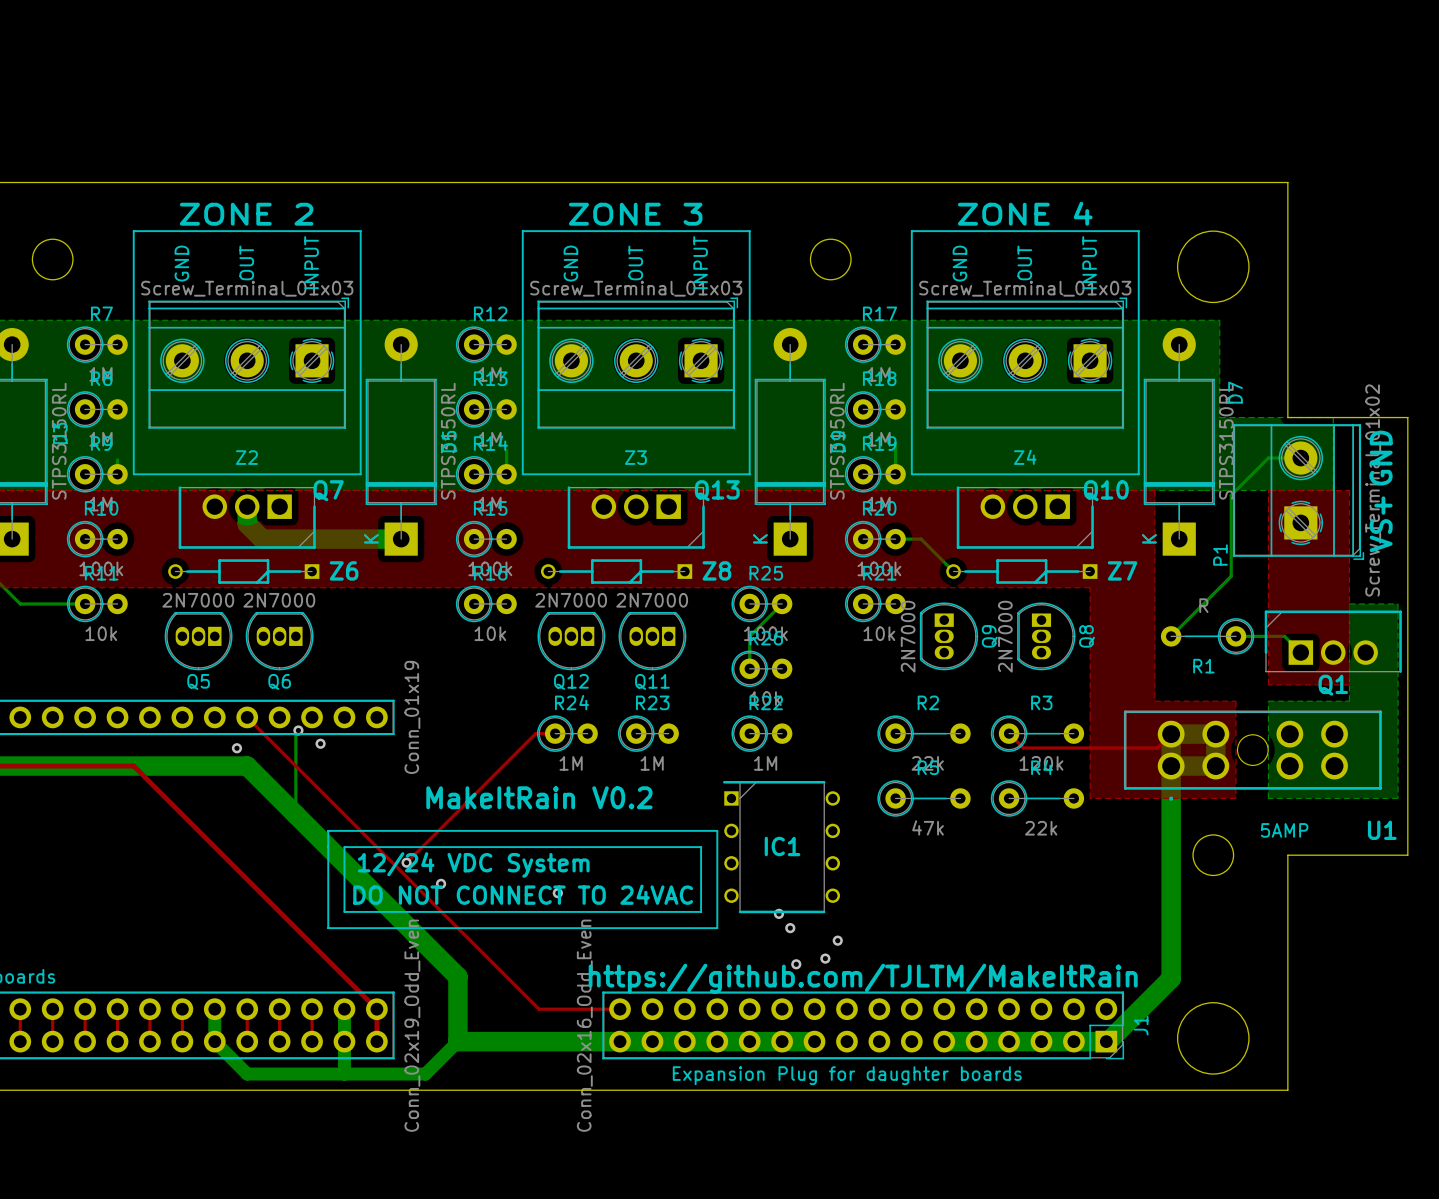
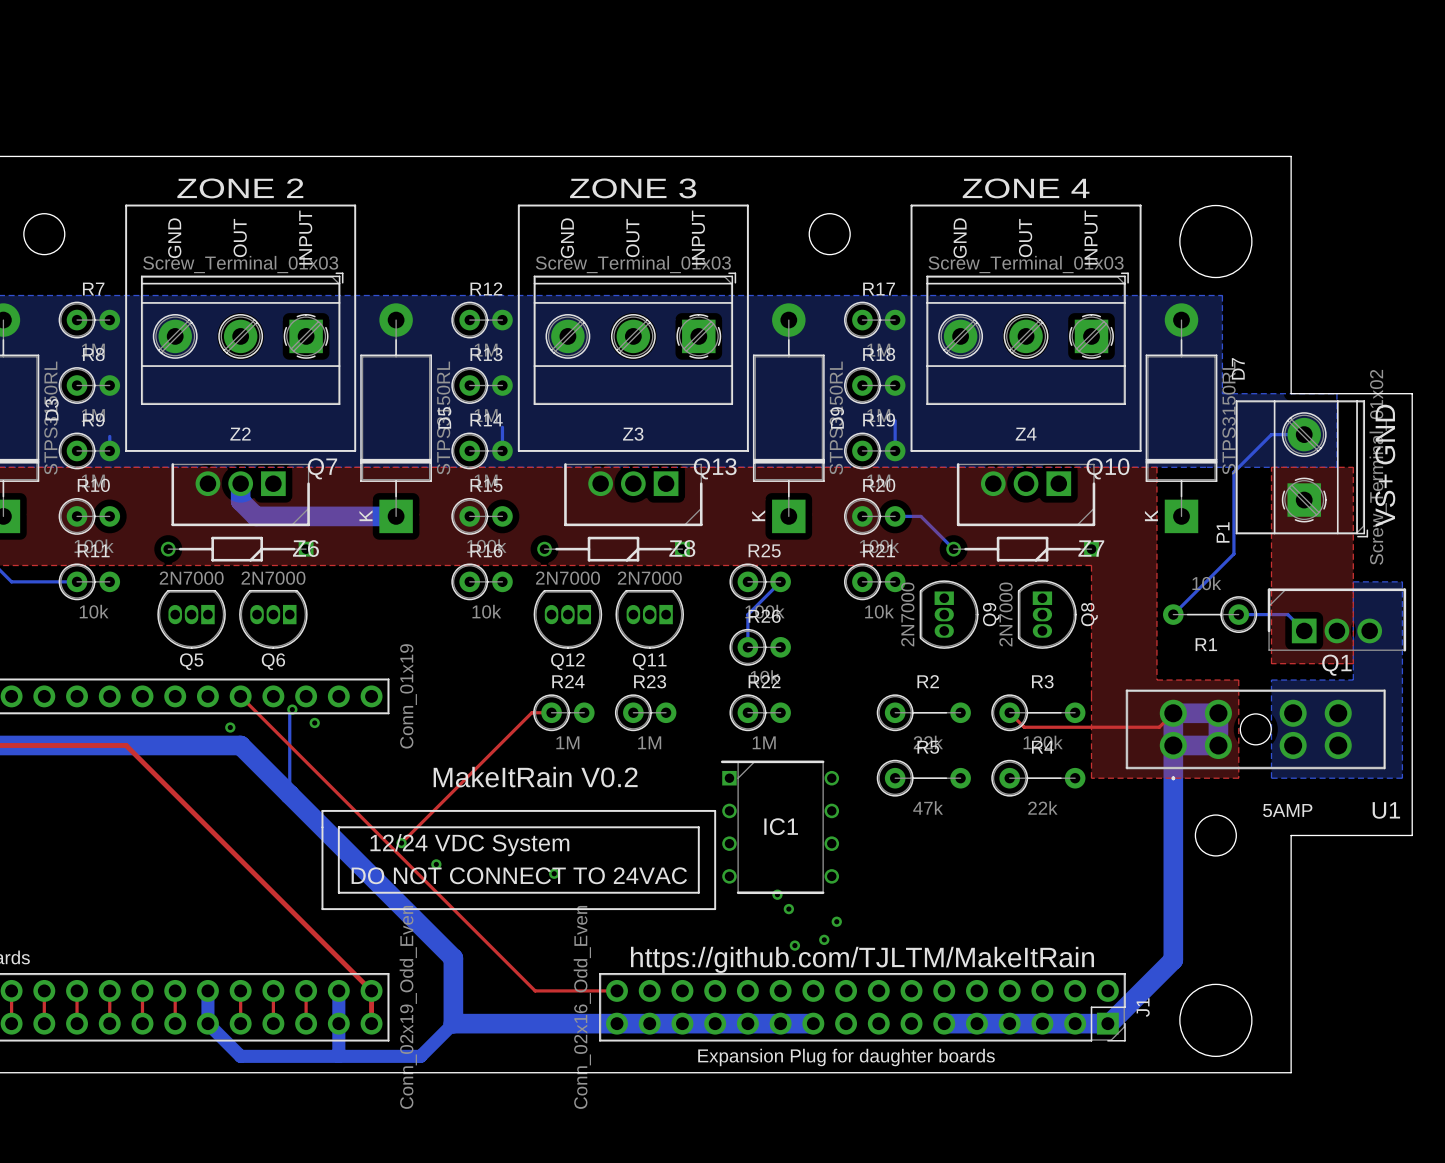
Z6 name position: Z6 (344, 570) -> Z6 (305, 548)
Z8 name position: Z8 (716, 570) -> Z8 (682, 548)
Z7 name position: Z7 (1122, 570) -> Z7 (1091, 548)
R1 value: R (1203, 605) -> 10k (1206, 583)

